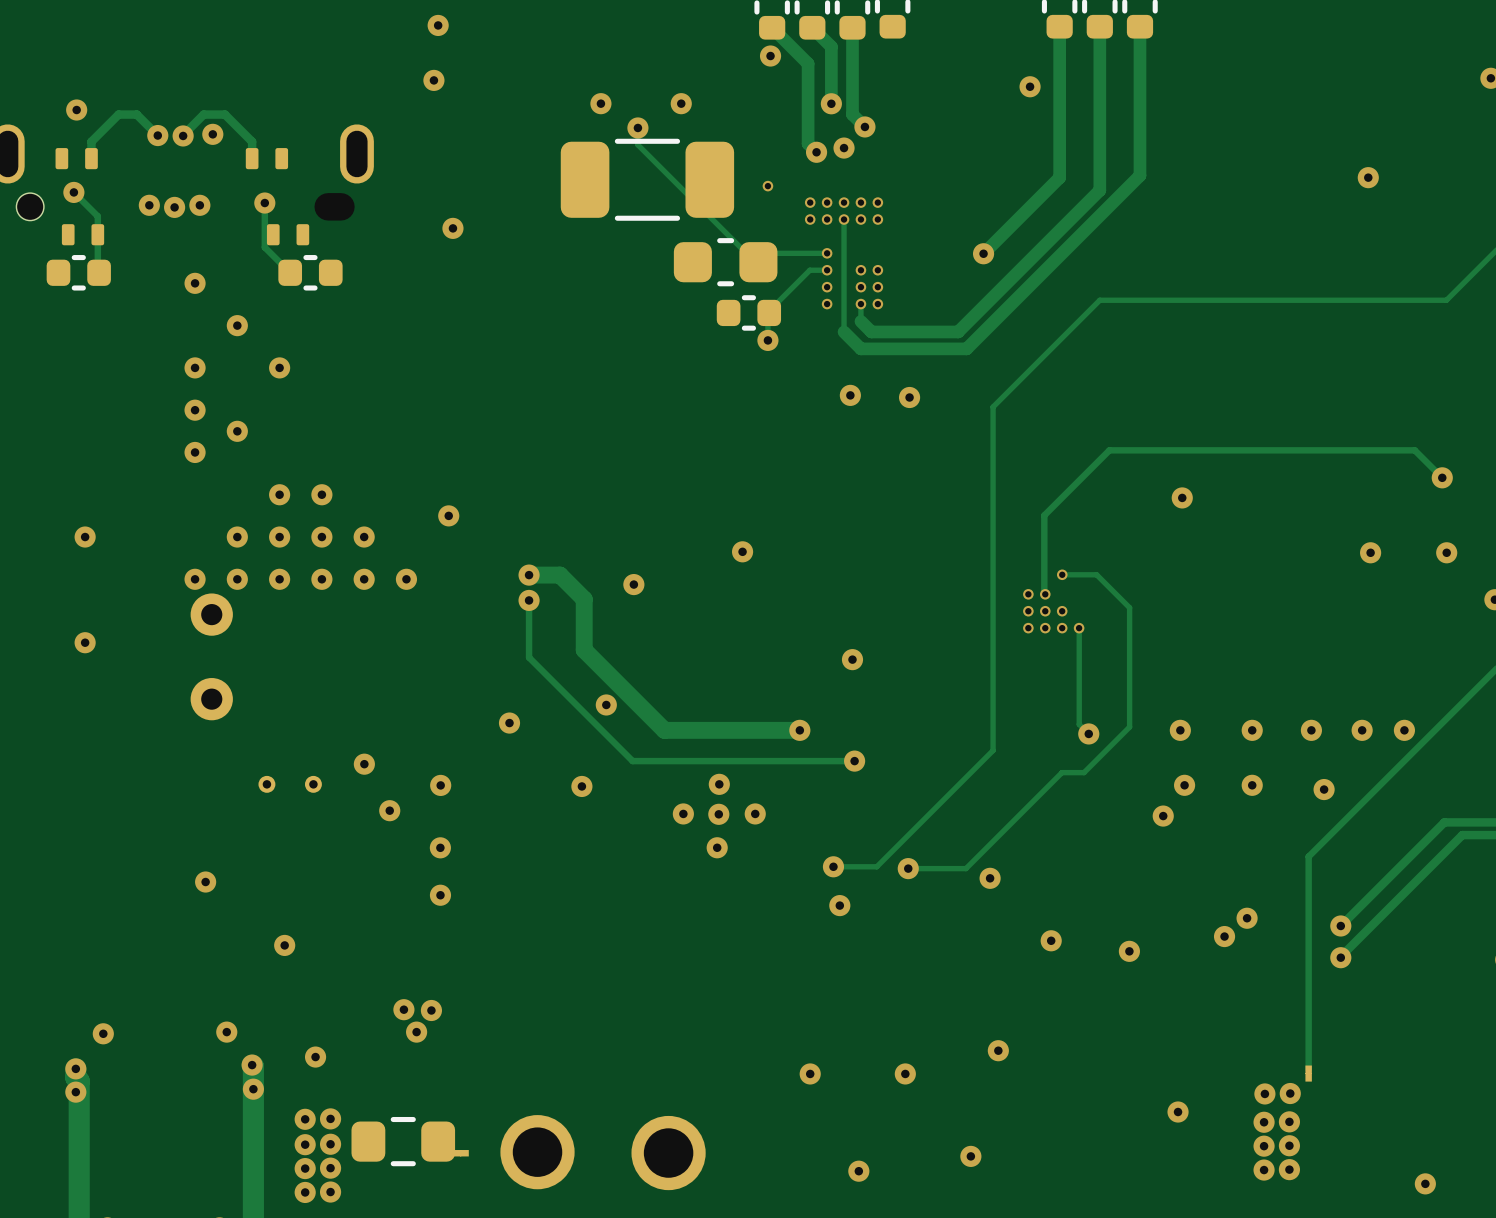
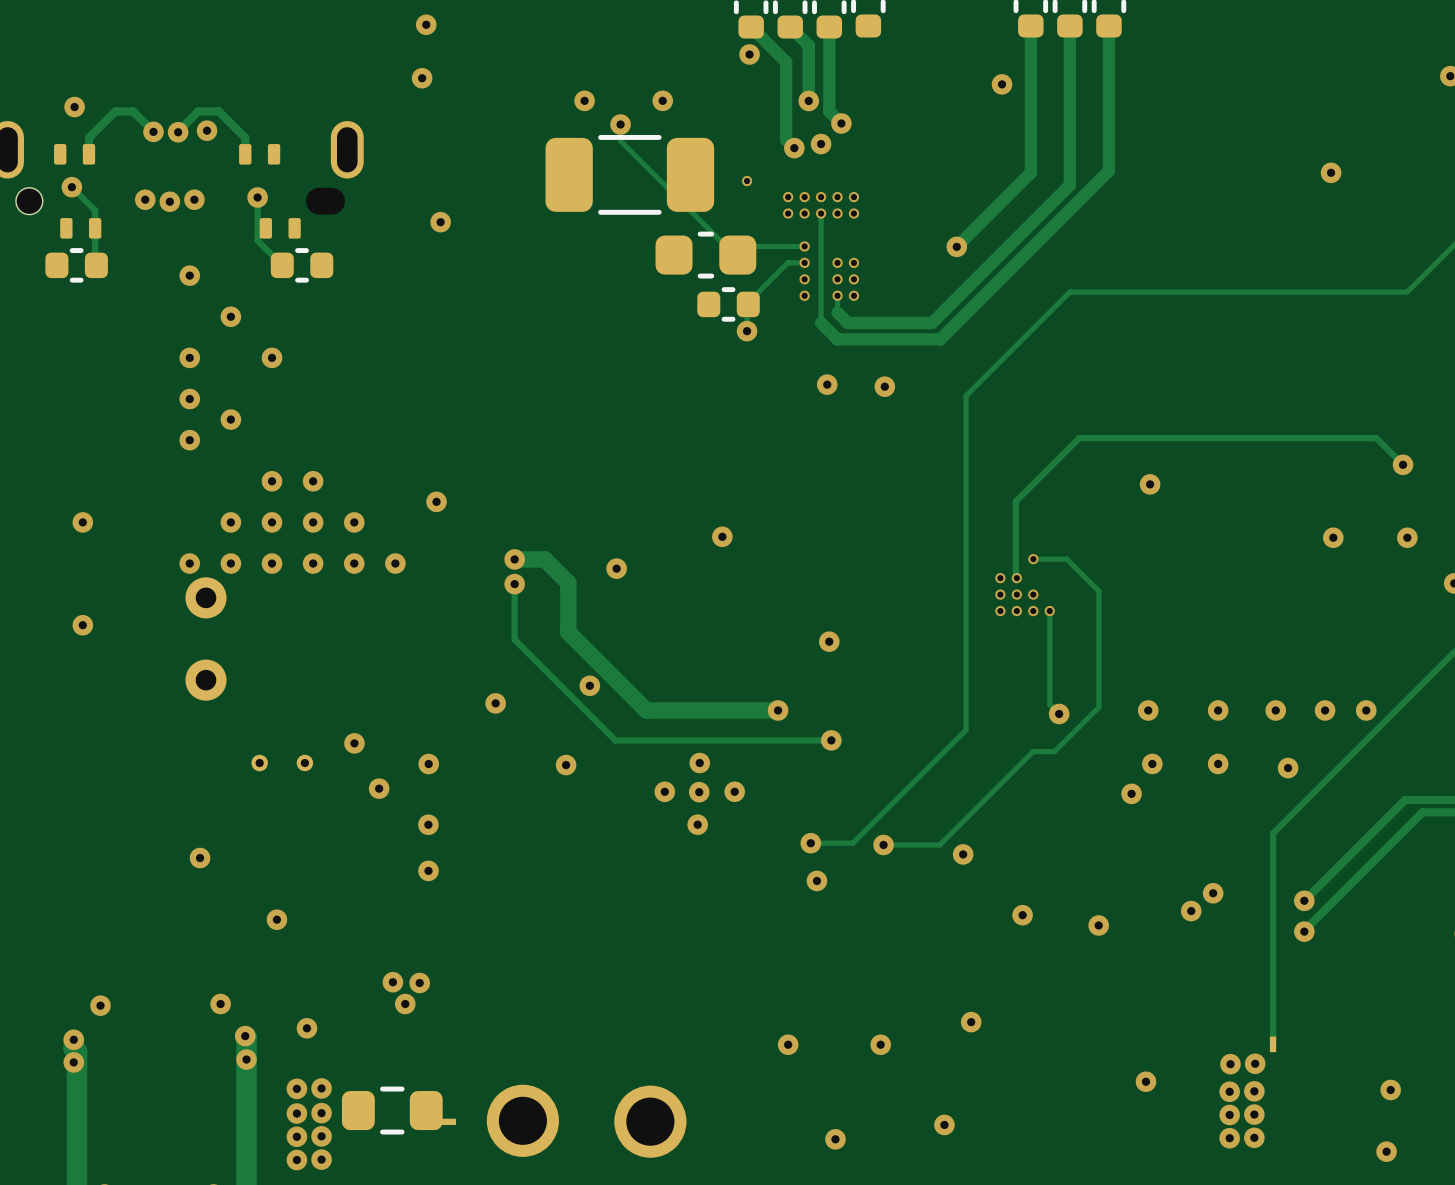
via: none -> (1390, 1089)

